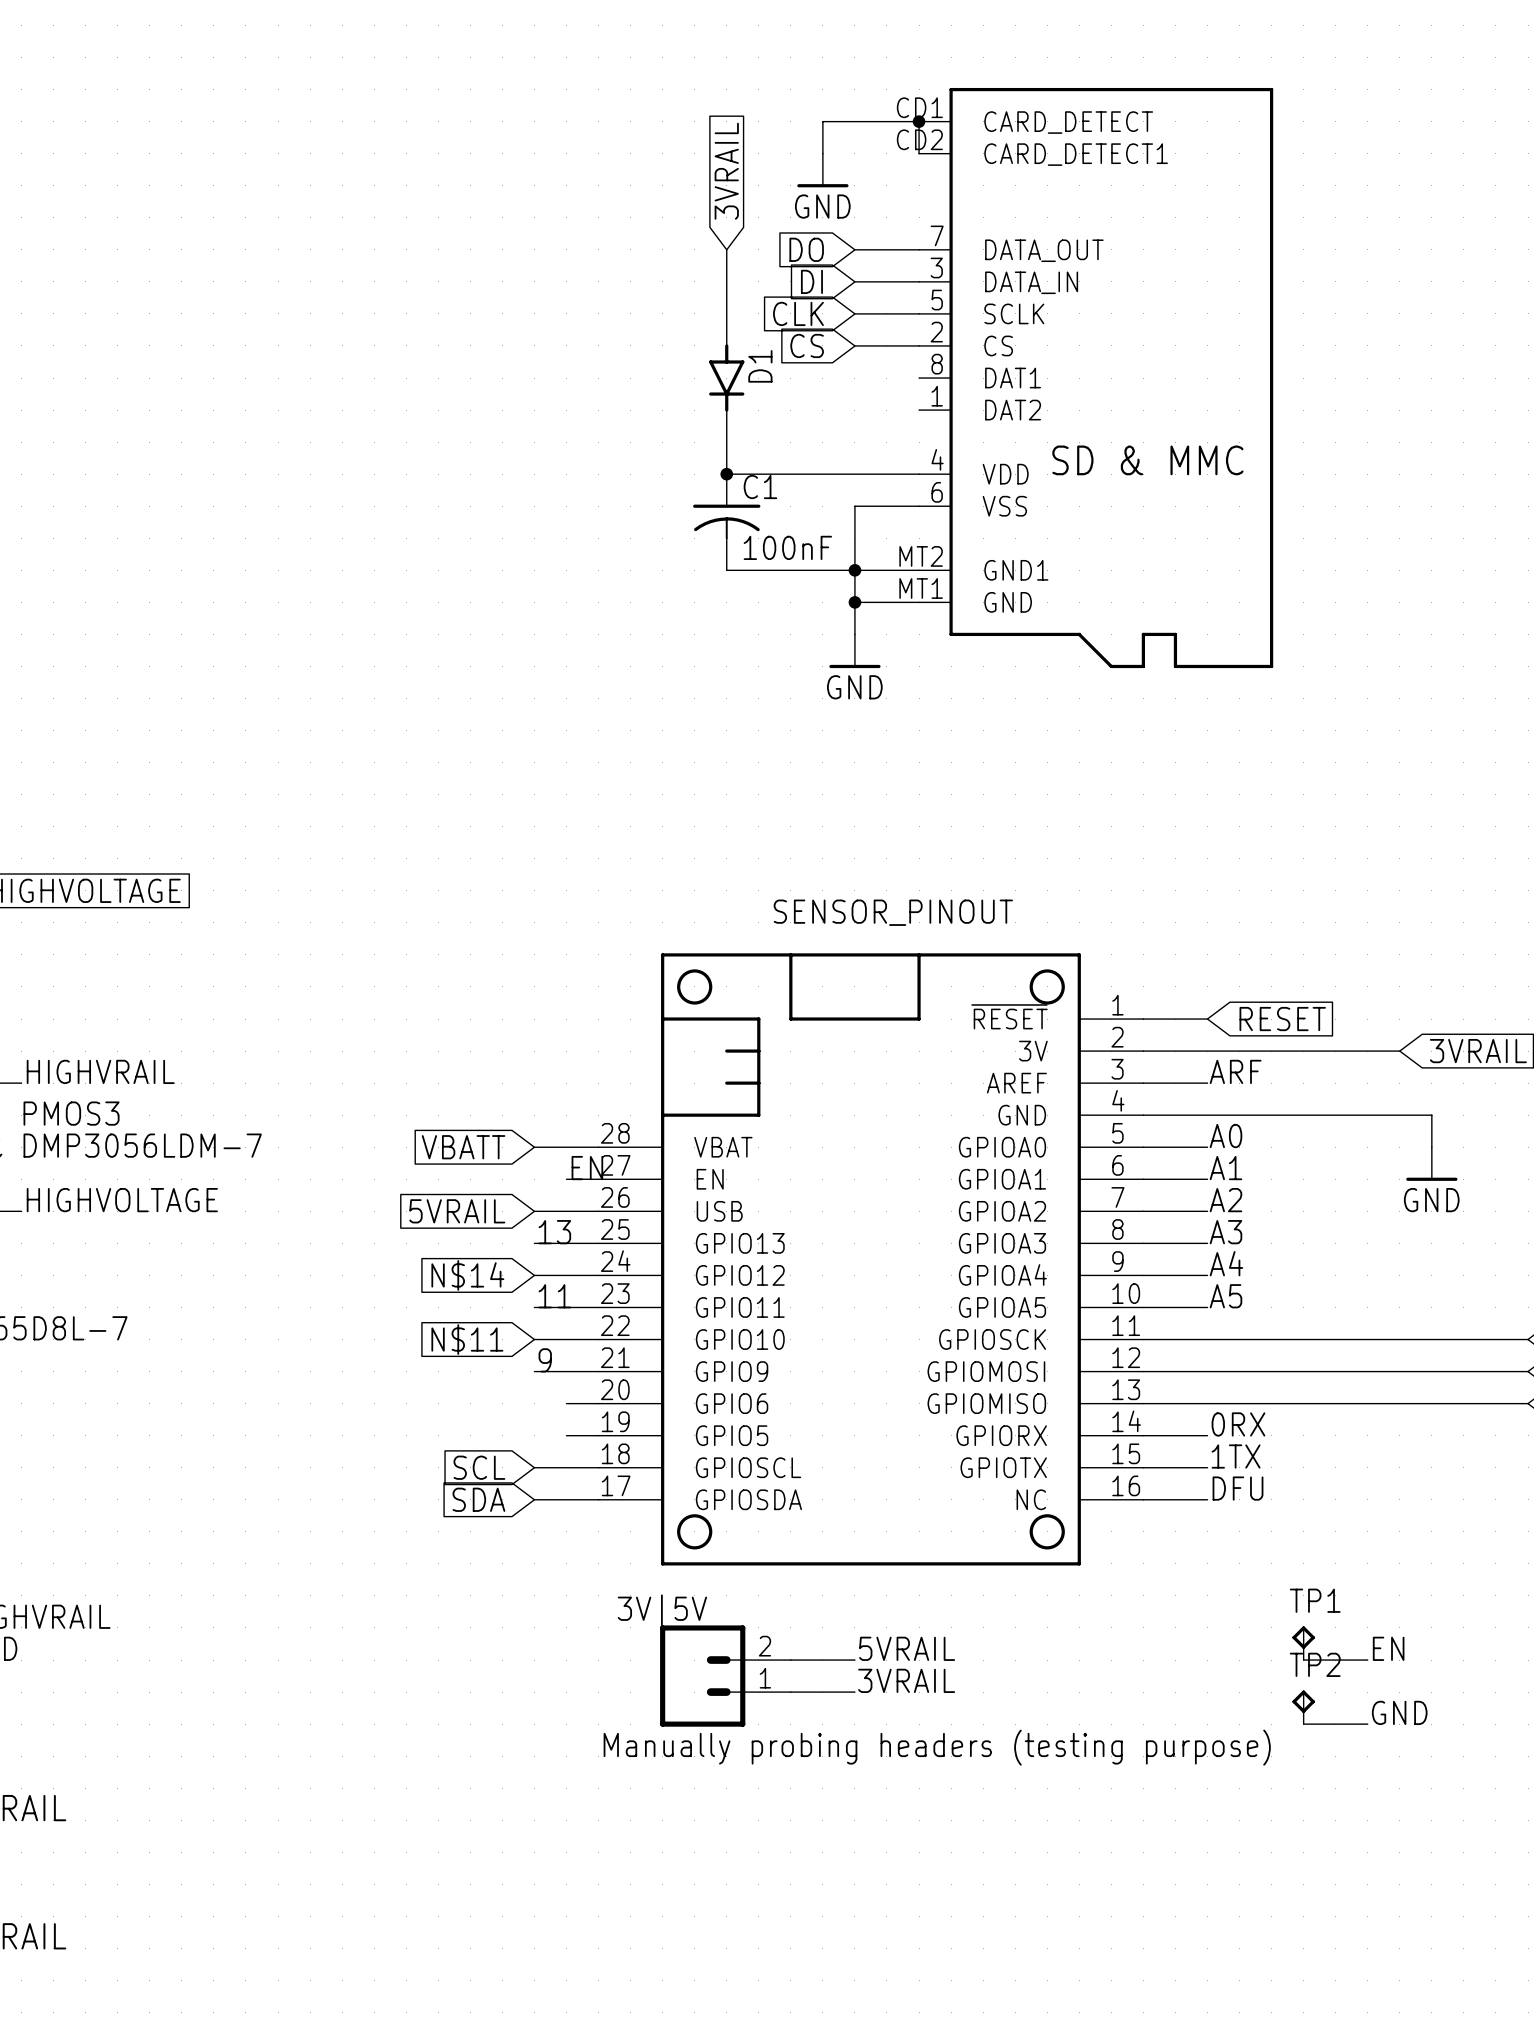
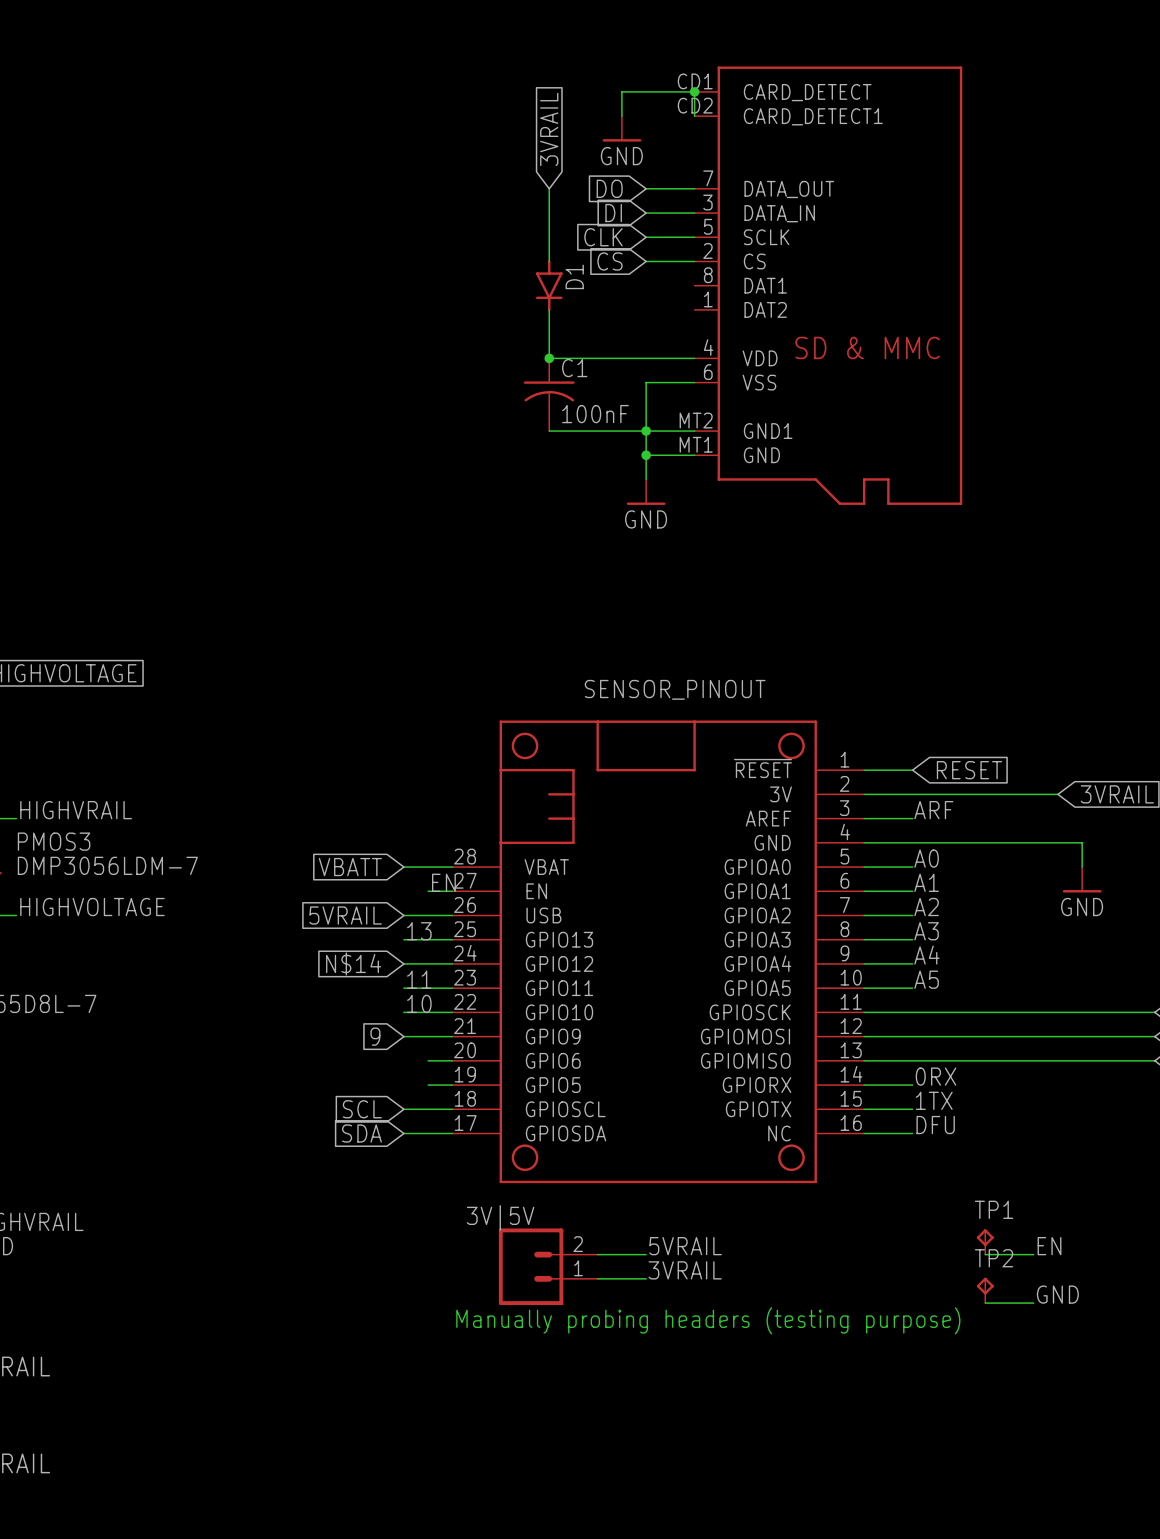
label: none -> 10 (419, 1003)
global label: N$11 (467, 1339) -> none
label: 9 (545, 1360) -> none
global label: none -> 9 (375, 1036)

